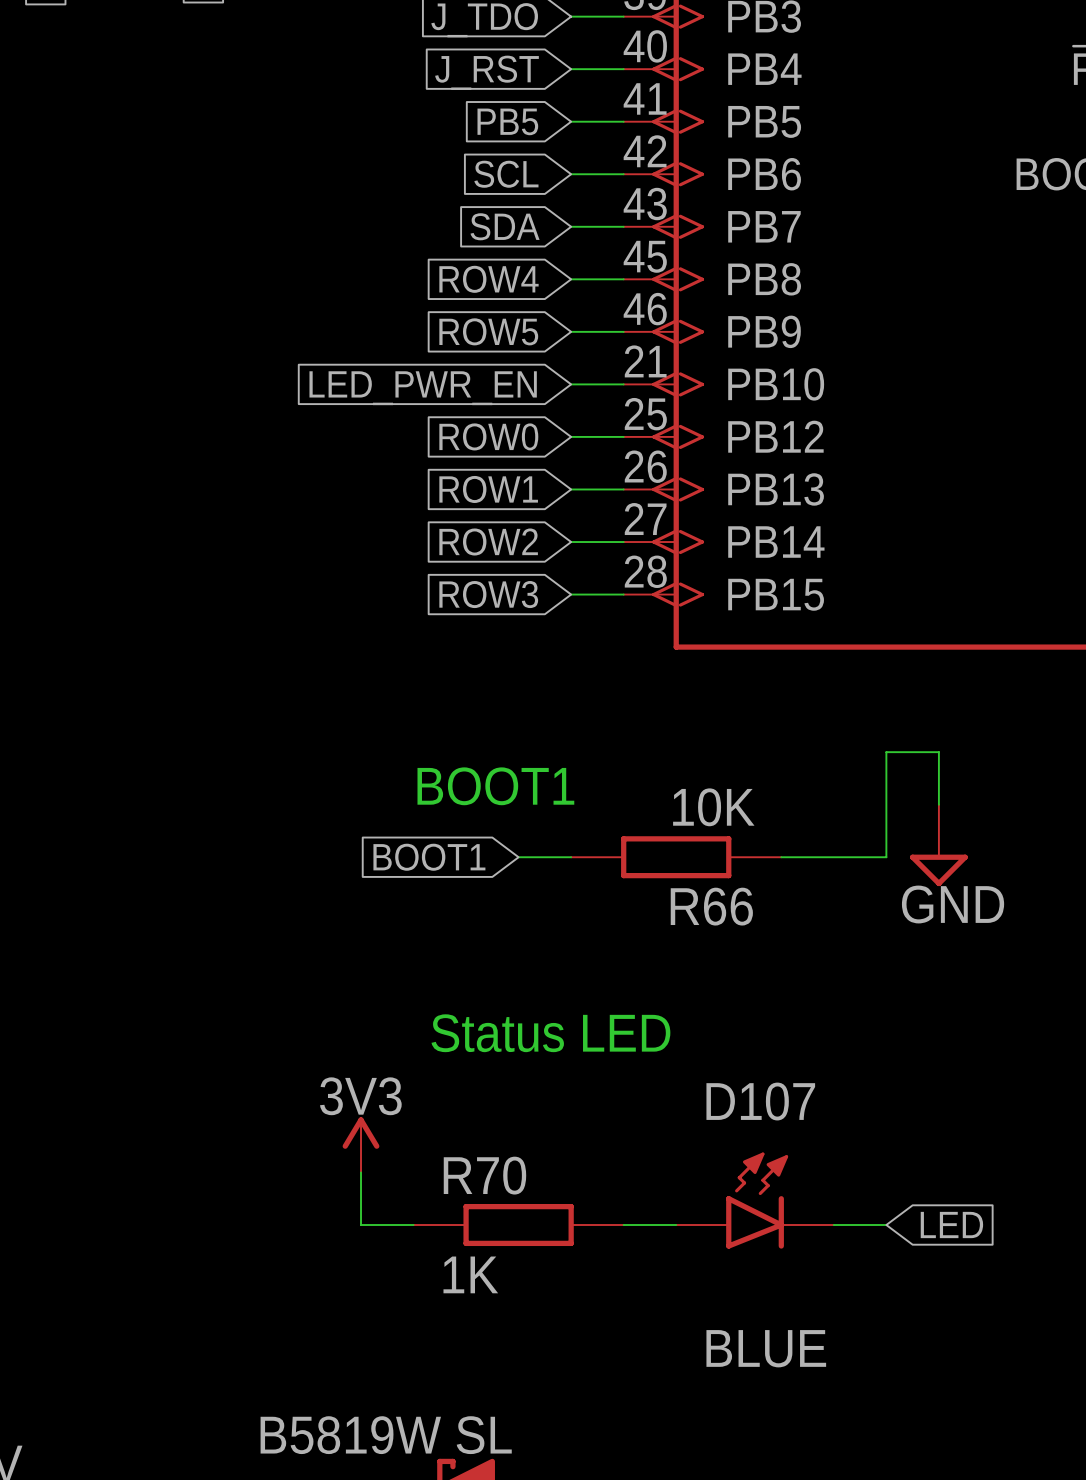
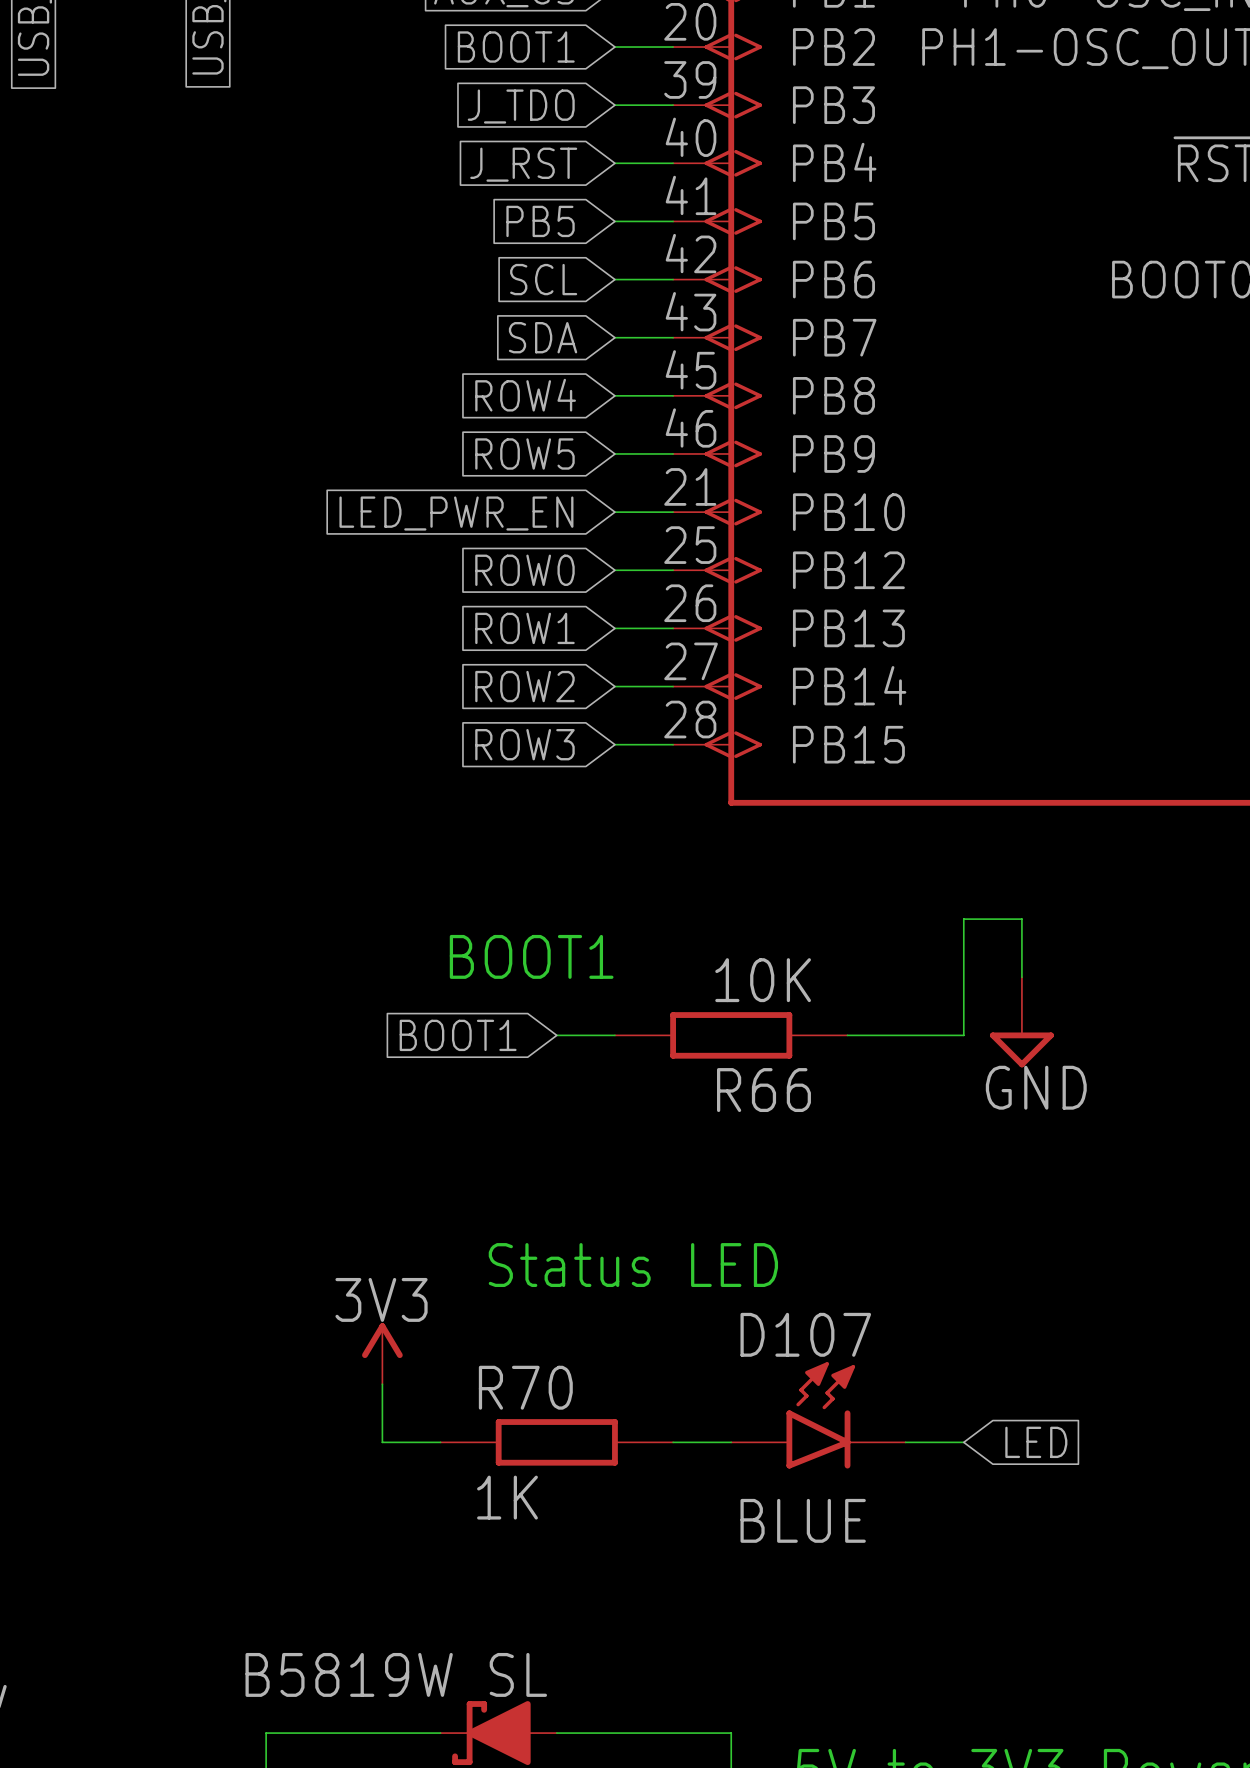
text position: Status LED (550, 1033) -> Status LED (633, 1265)
D107 name position: D107 (760, 1101) -> D107 (805, 1334)
D107 value position: BLUE (766, 1348) -> BLUE (803, 1520)

